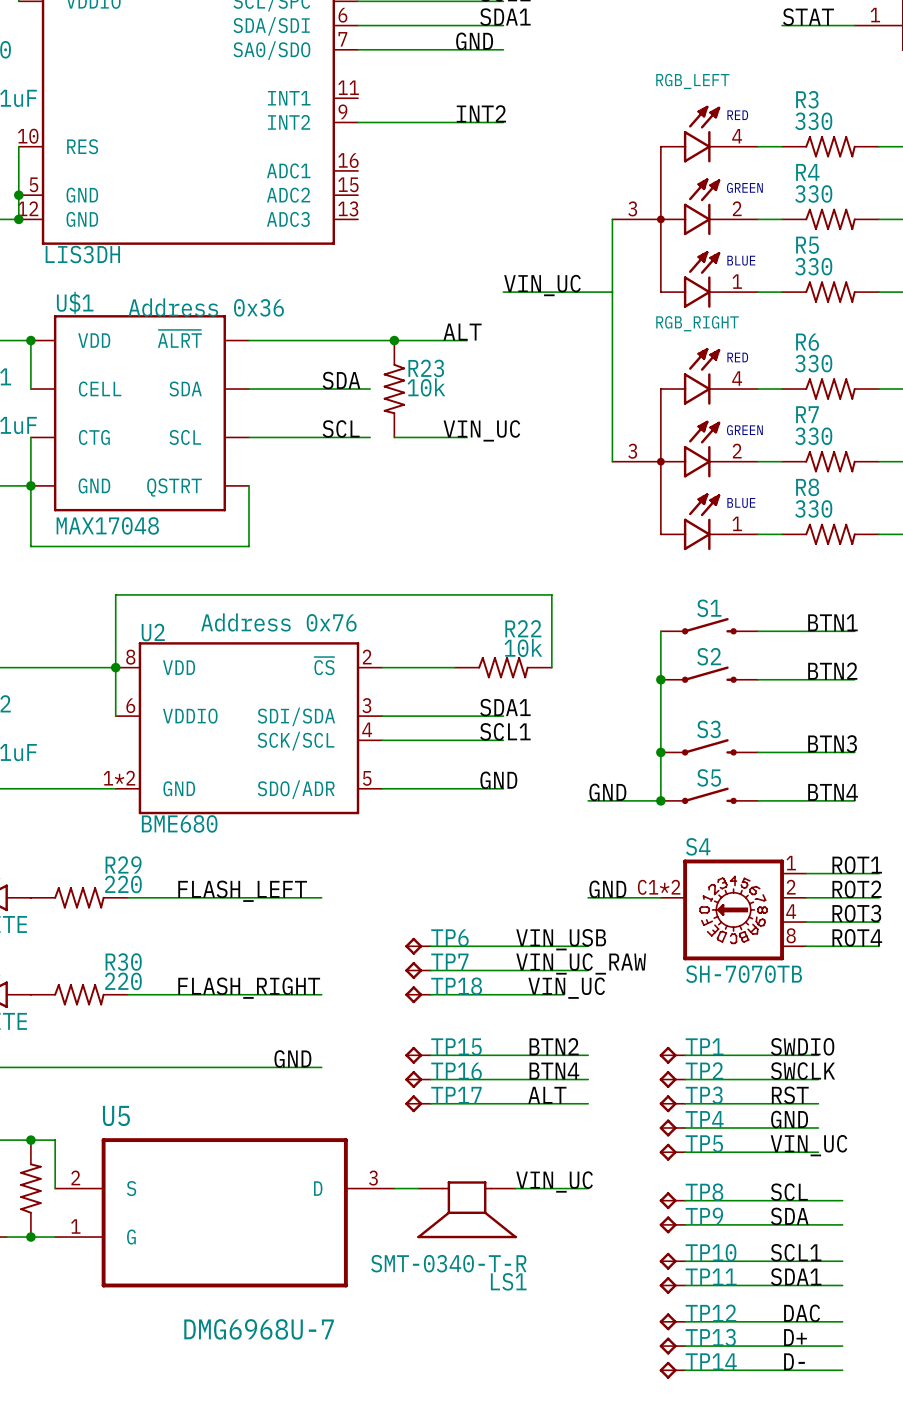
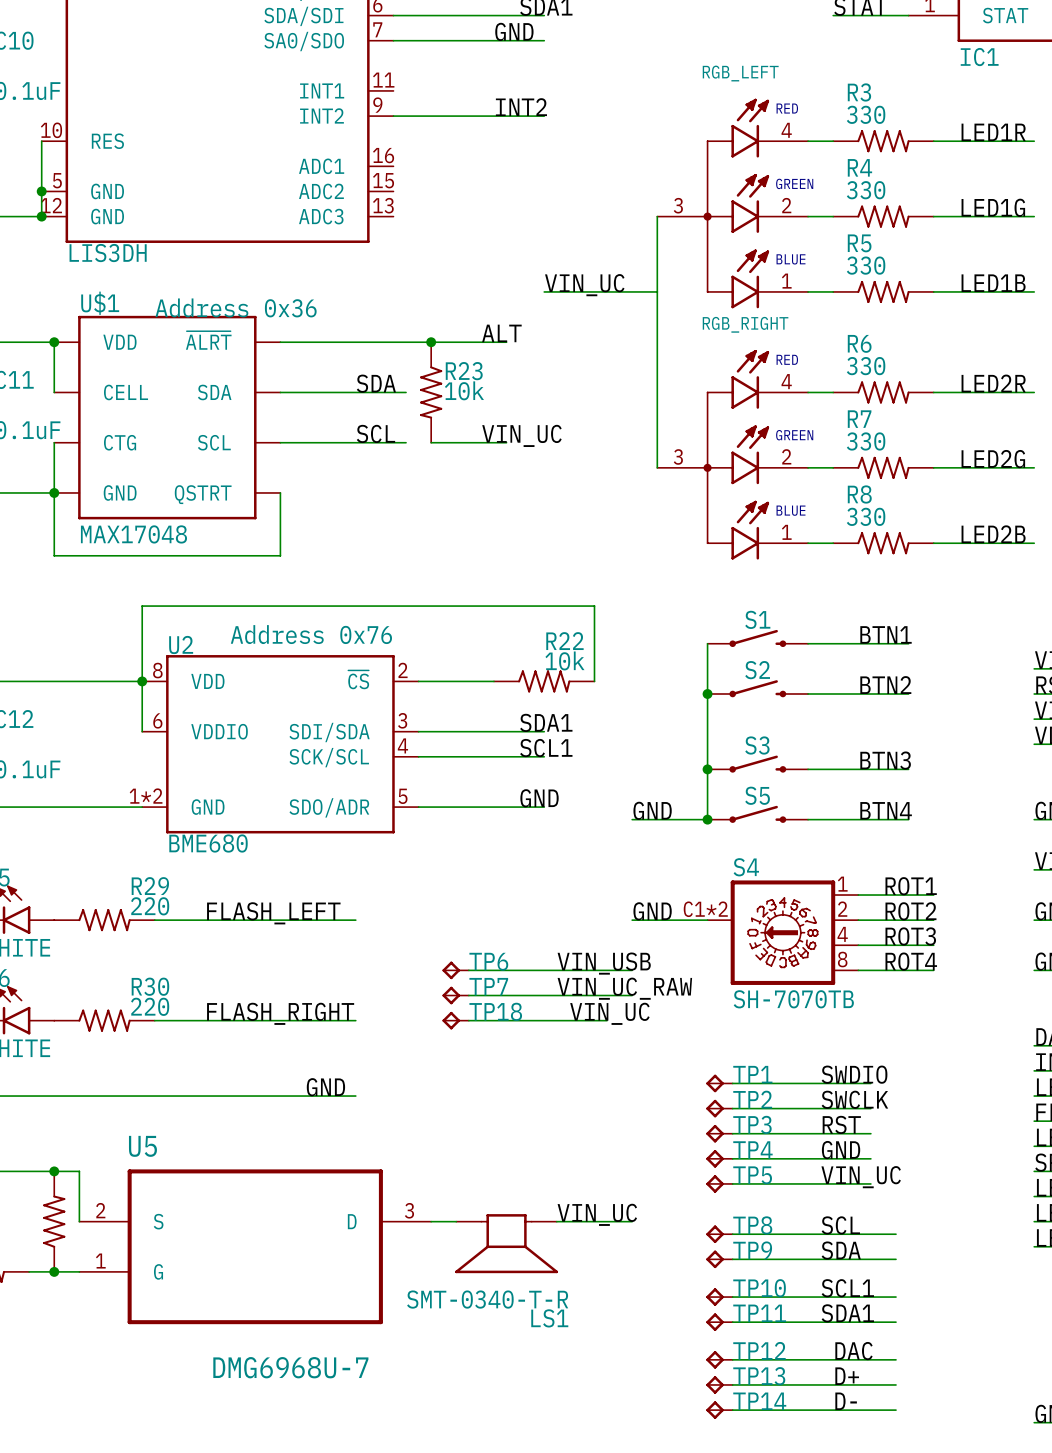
text: TP15 (456, 1046) -> none
label: BTN2 (554, 1046) -> none
part: (417, 1055) -> none
wire: (430, 1055) (588, 1055) -> none
text: TP16 (456, 1071) -> none
label: BTN4 (554, 1071) -> none
part: (417, 1079) -> none
wire: (430, 1079) (588, 1079) -> none
text: TP17 (456, 1095) -> none
label: ALT (547, 1095) -> none
part: (417, 1103) -> none
wire: (430, 1103) (588, 1103) -> none

